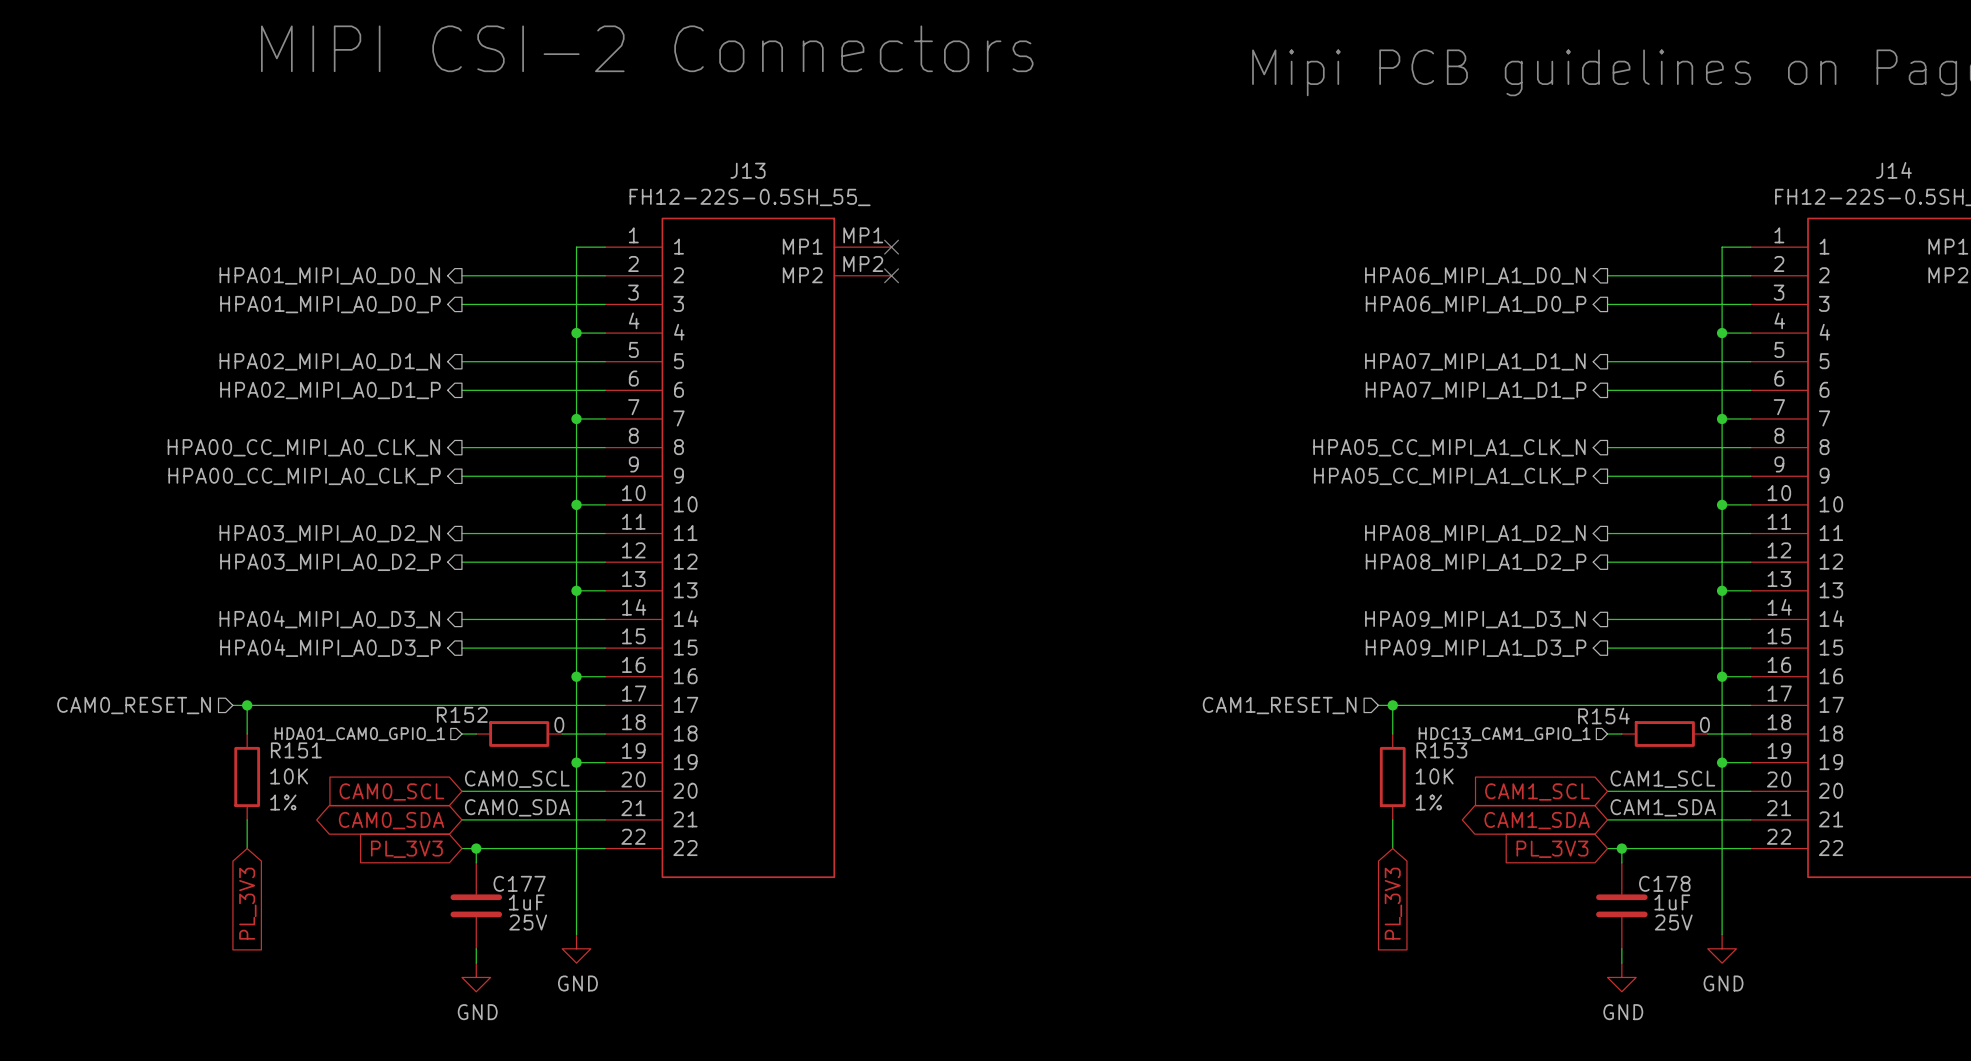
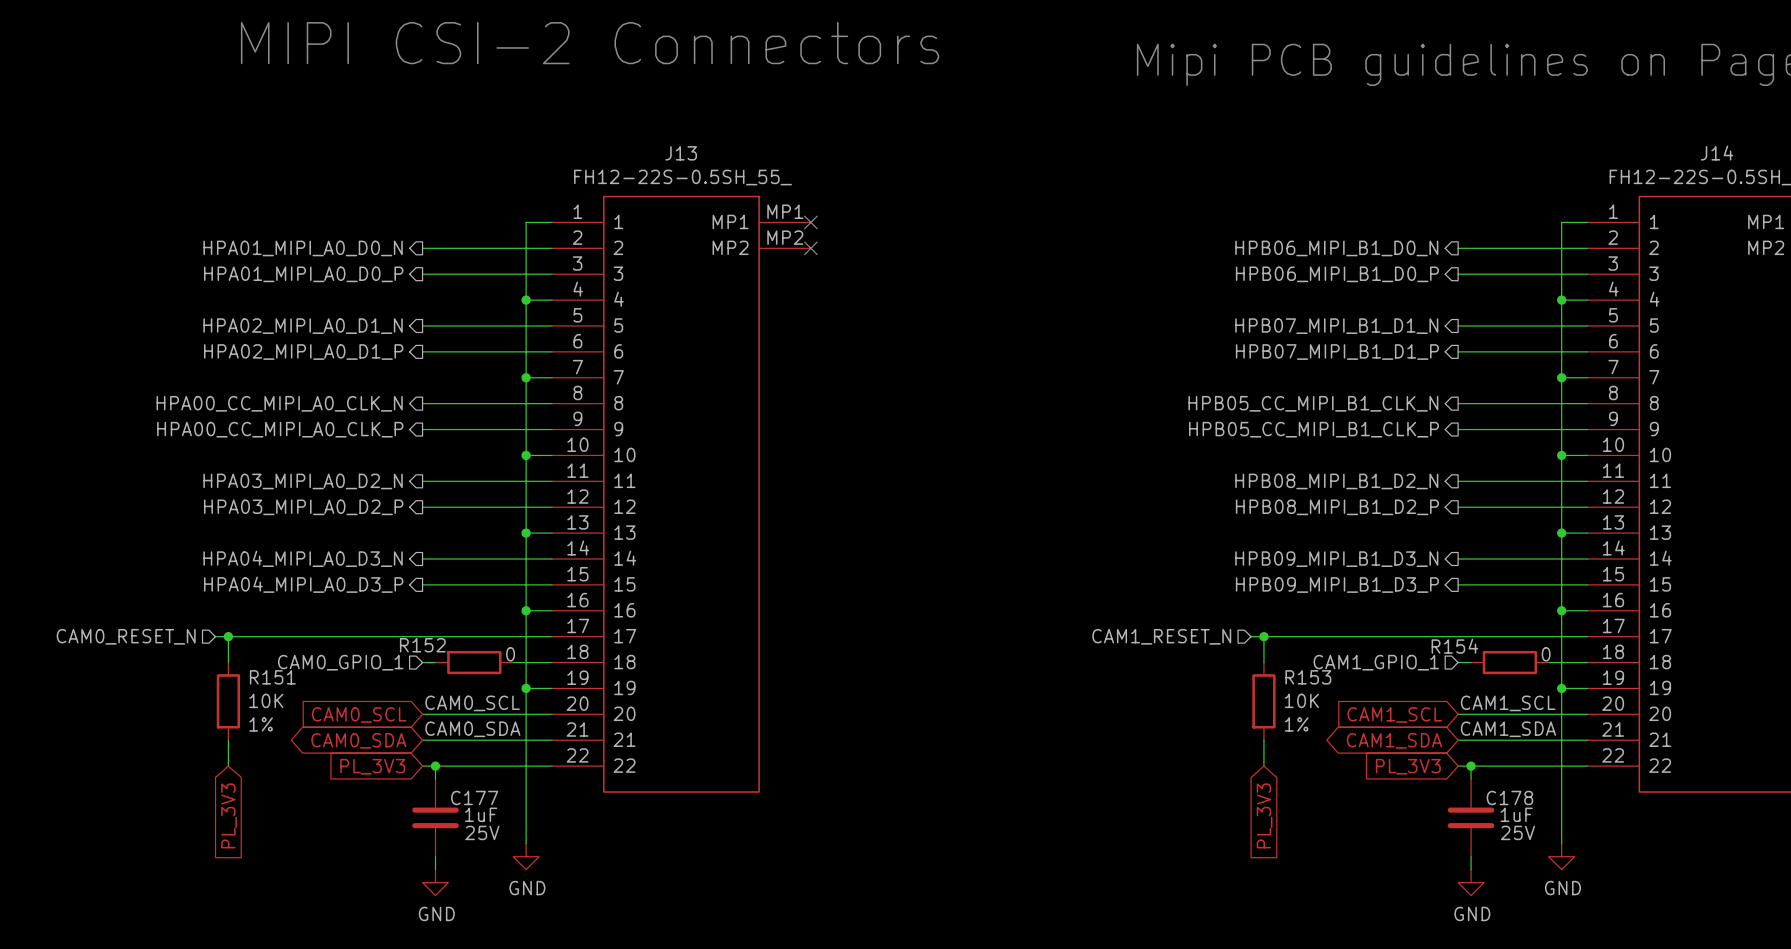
hierarchical label: HPA06_MIPI_A1_D0_N (1475, 275) -> HPB06_MIPI_B1_D0_N (1336, 248)
hierarchical label: HPA06_MIPI_A1_D0_P (1476, 304) -> HPB06_MIPI_B1_D0_P (1337, 274)
hierarchical label: HPA07_MIPI_A1_D1_N (1475, 361) -> HPB07_MIPI_B1_D1_N (1336, 326)
hierarchical label: HPA07_MIPI_A1_D1_P (1476, 390) -> HPB07_MIPI_B1_D1_P (1337, 352)
hierarchical label: HPA05_CC_MIPI_A1_CLK_N (1449, 447) -> HPB05_CC_MIPI_B1_CLK_N (1313, 403)
hierarchical label: HPA05_CC_MIPI_A1_CLK_P (1450, 476) -> HPB05_CC_MIPI_B1_CLK_P (1313, 429)
hierarchical label: HPA08_MIPI_A1_D2_N (1475, 533) -> HPB08_MIPI_B1_D2_N (1336, 481)
hierarchical label: HPA08_MIPI_A1_D2_P (1476, 562) -> HPB08_MIPI_B1_D2_P (1337, 507)
hierarchical label: HPA09_MIPI_A1_D3_N (1475, 619) -> HPB09_MIPI_B1_D3_N (1336, 559)
hierarchical label: HPA09_MIPI_A1_D3_P (1476, 648) -> HPB09_MIPI_B1_D3_P (1337, 585)
hierarchical label: HDA01_CAM0_GPIO_1 (359, 734) -> CAM0_GPIO_1 (340, 662)
hierarchical label: HDC13_CAM1_GPIO_1 (1504, 734) -> CAM1_GPIO_1 (1376, 662)

